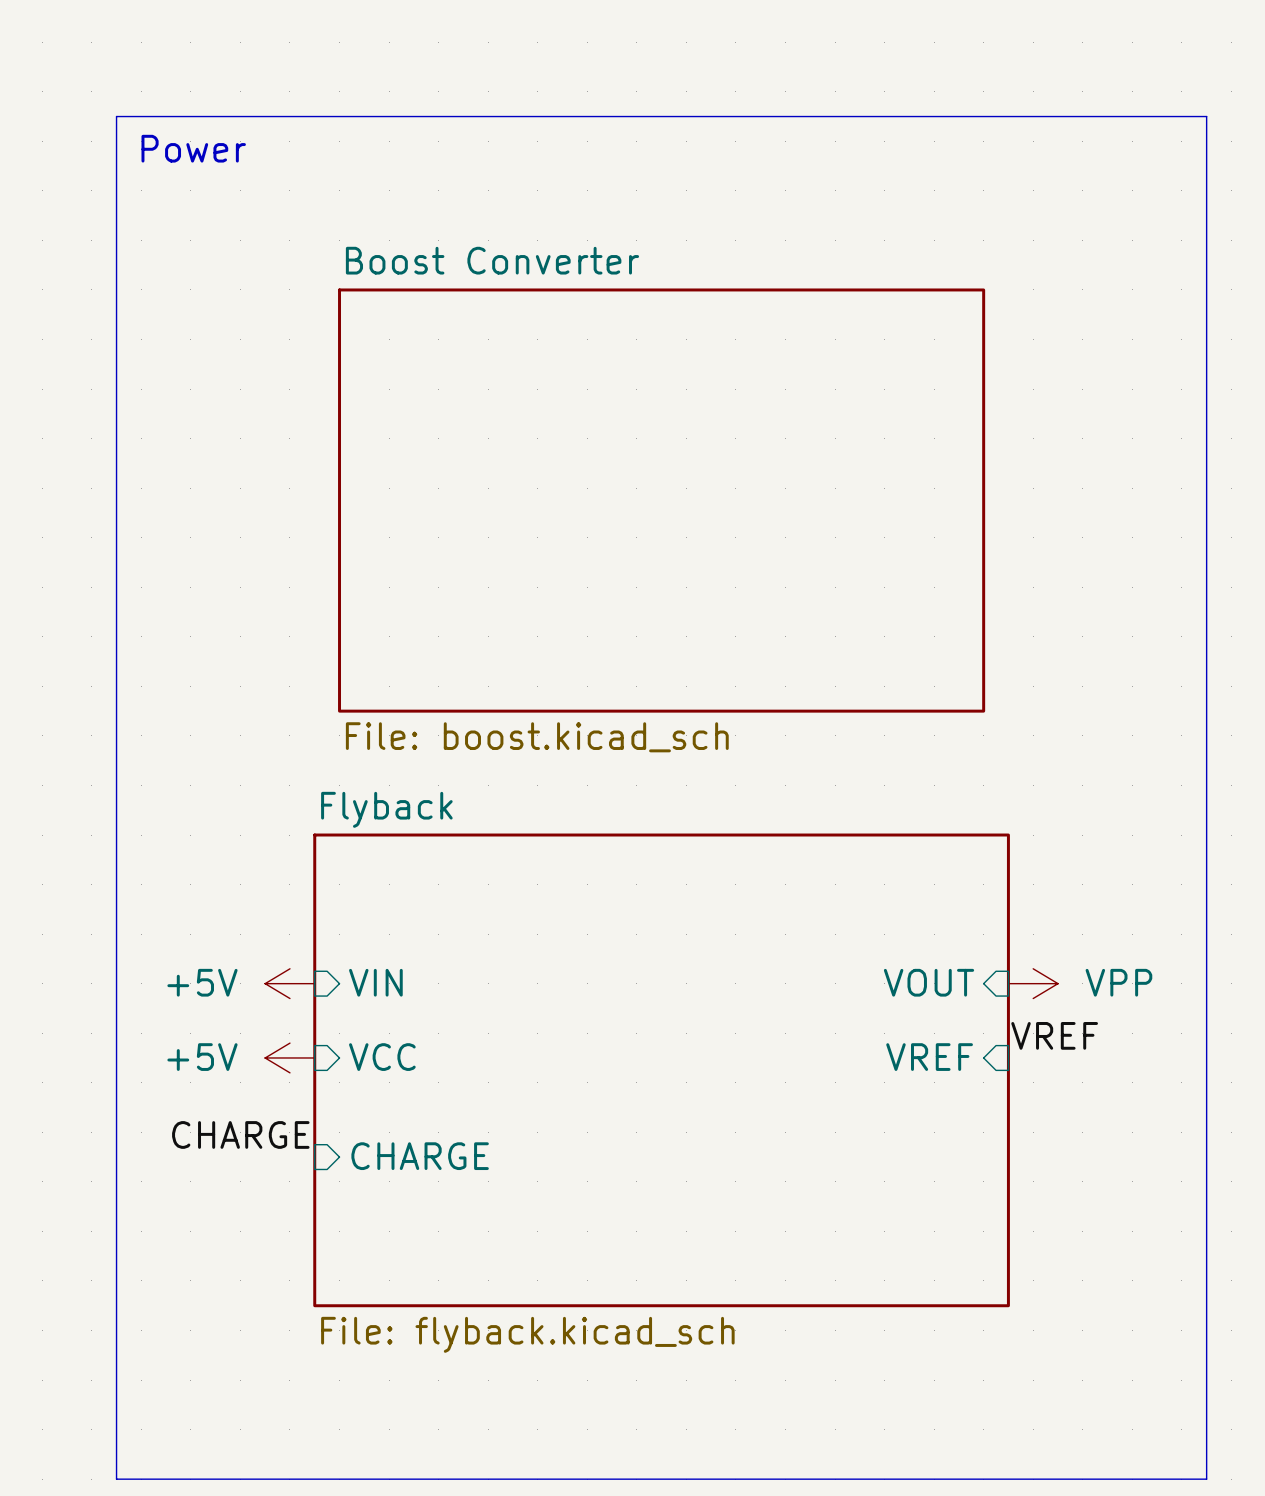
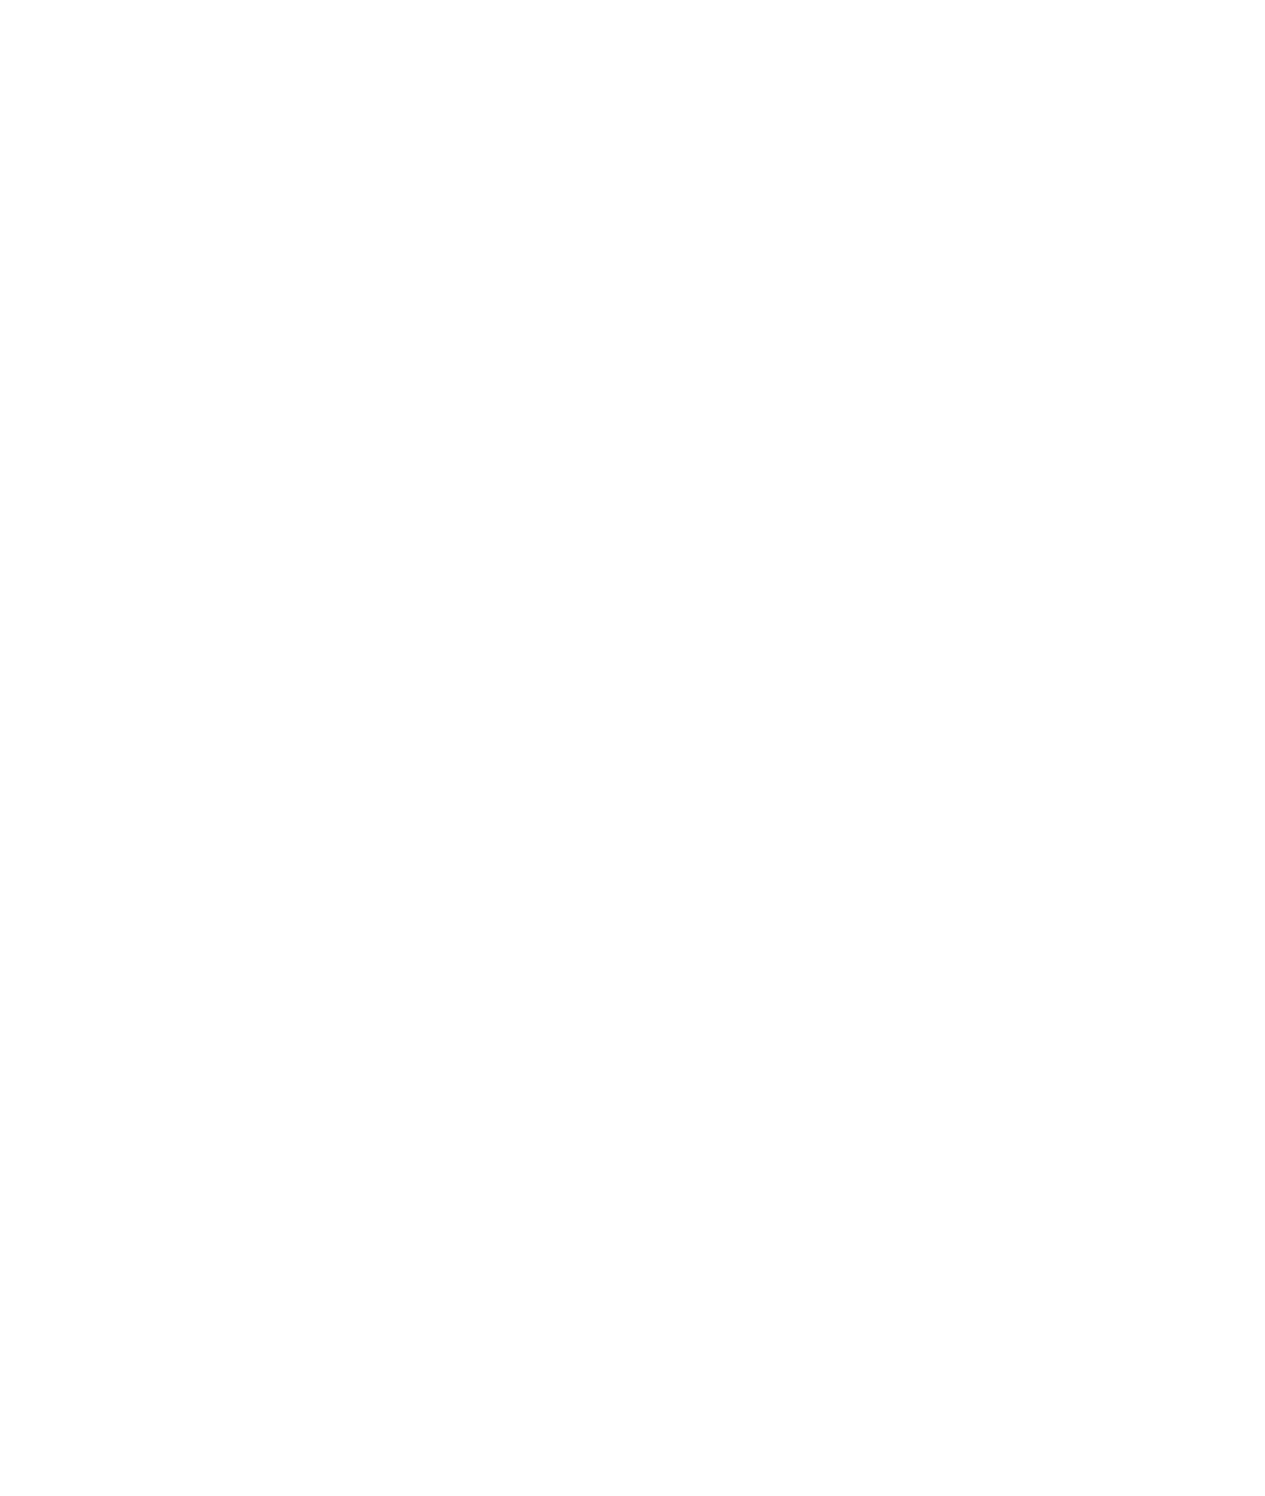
line: (116, 116) (1206, 116) (1206, 1479) (116, 1479) (116, 116) -> none
text: Power (193, 148) -> none
sheet Boost Converter: File: boost.kicad_sch (661, 500) -> none
sheet pin: VIN (375, 982) -> none
sheet pin: VOUT (929, 982) -> none
power symbol: +5V (289, 983) -> none
power symbol: VPP (1033, 983) -> none
label: VREF (1054, 1035) -> none
power symbol: +5V (289, 1057) -> none
sheet pin: VCC (382, 1057) -> none
sheet pin: VREF (929, 1057) -> none
sheet Flyback: File: flyback.kicad_sch (661, 1070) -> none
label: CHARGE (240, 1134) -> none
sheet pin: CHARGE (420, 1156) -> none

